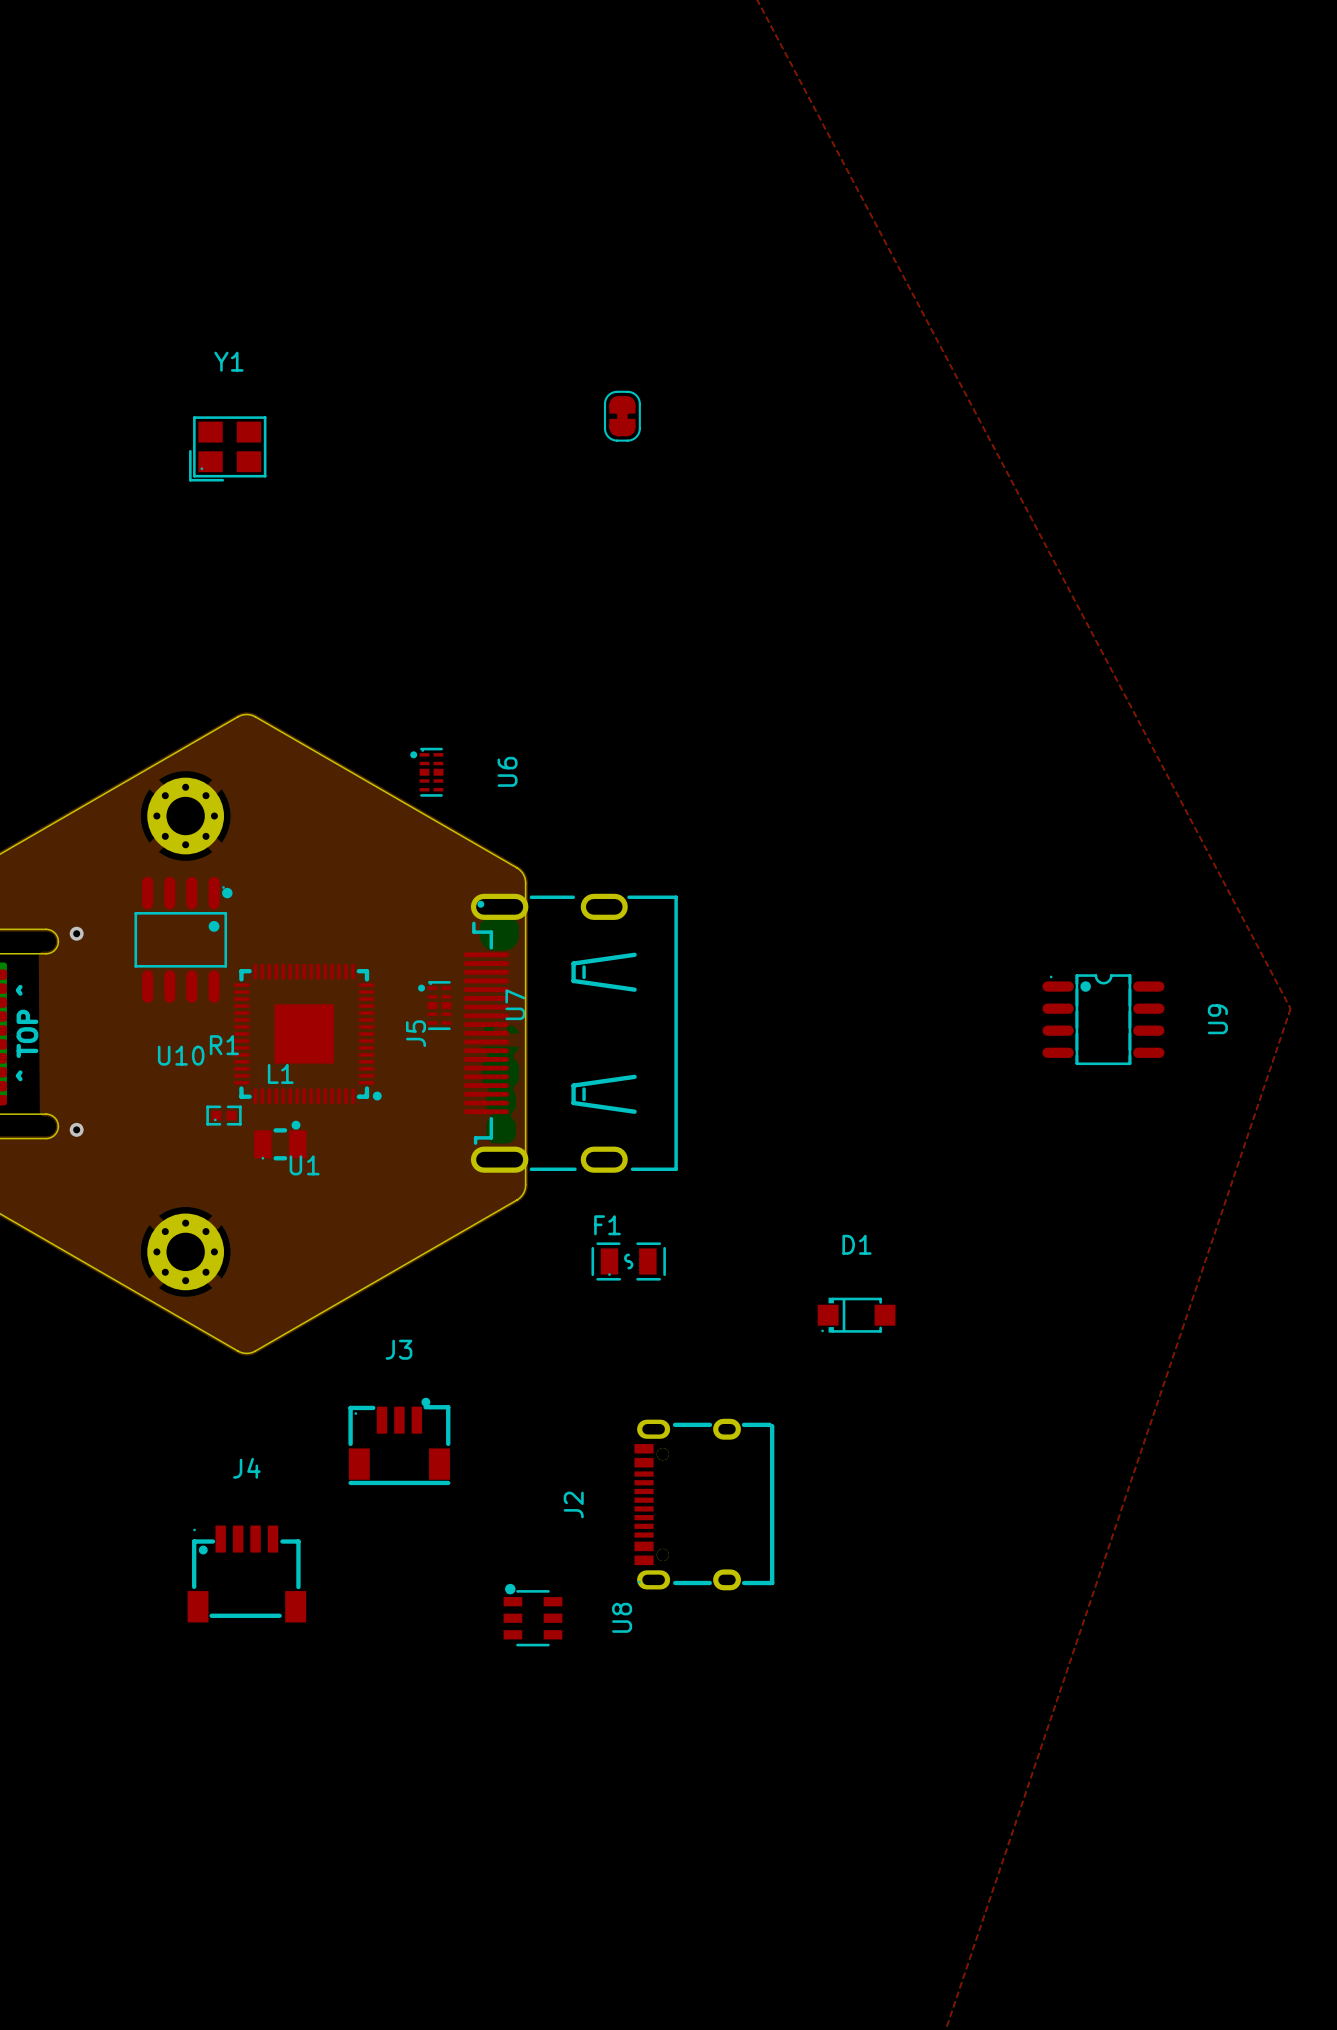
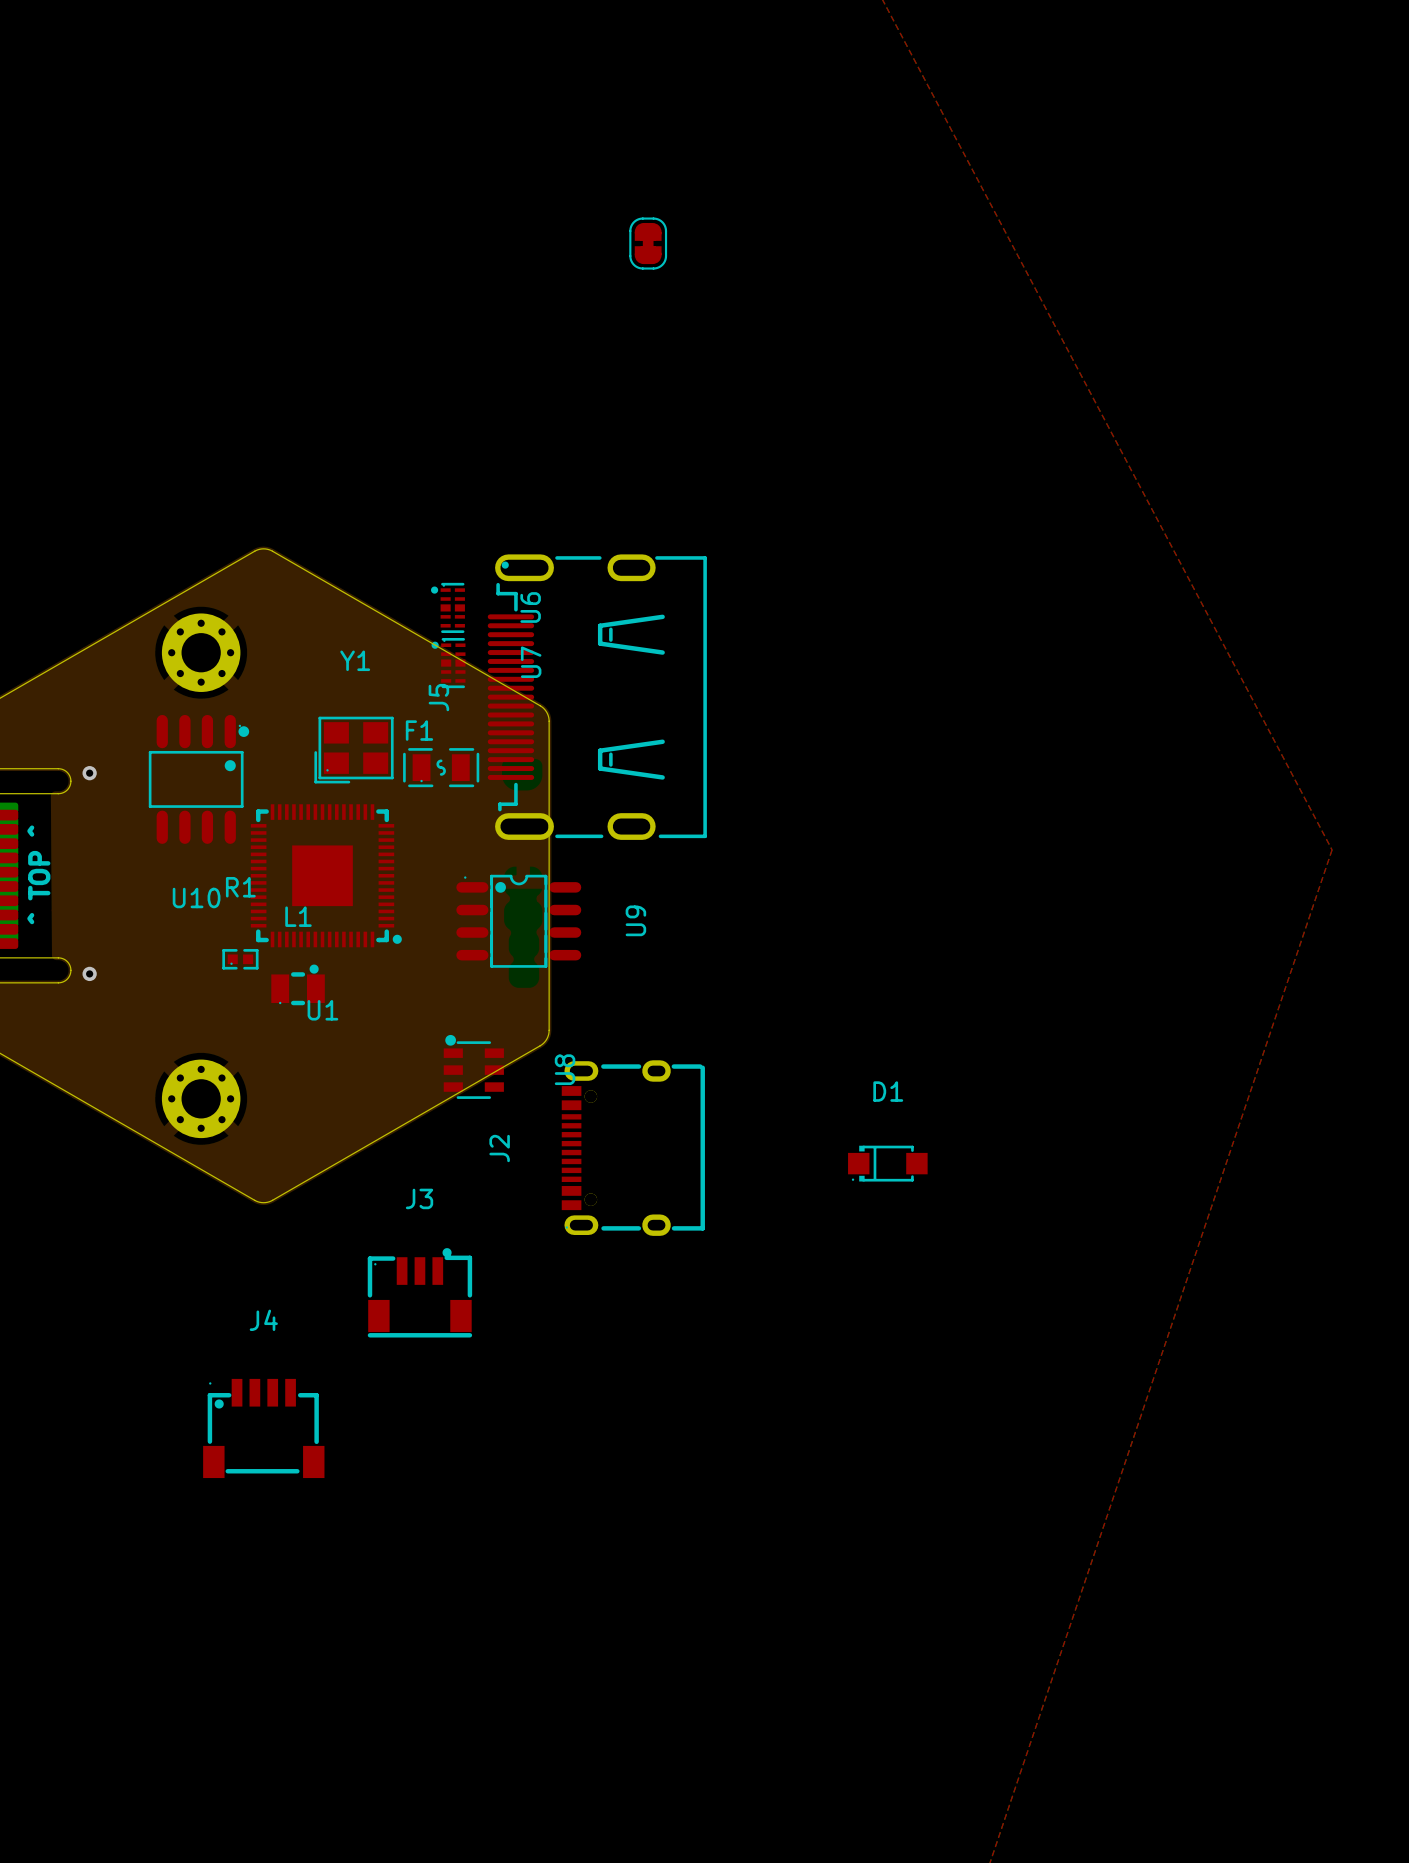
Y1 position: (227, 448) -> (354, 750)
U7 position: (434, 1005) -> (448, 663)
U9 position: (1103, 1019) -> (518, 921)
J5 position: (570, 1033) -> (597, 697)
F1 position: (628, 1261) -> (441, 767)
J2 position: (704, 1504) -> (633, 1148)
U8 position: (532, 1615) -> (473, 1066)

